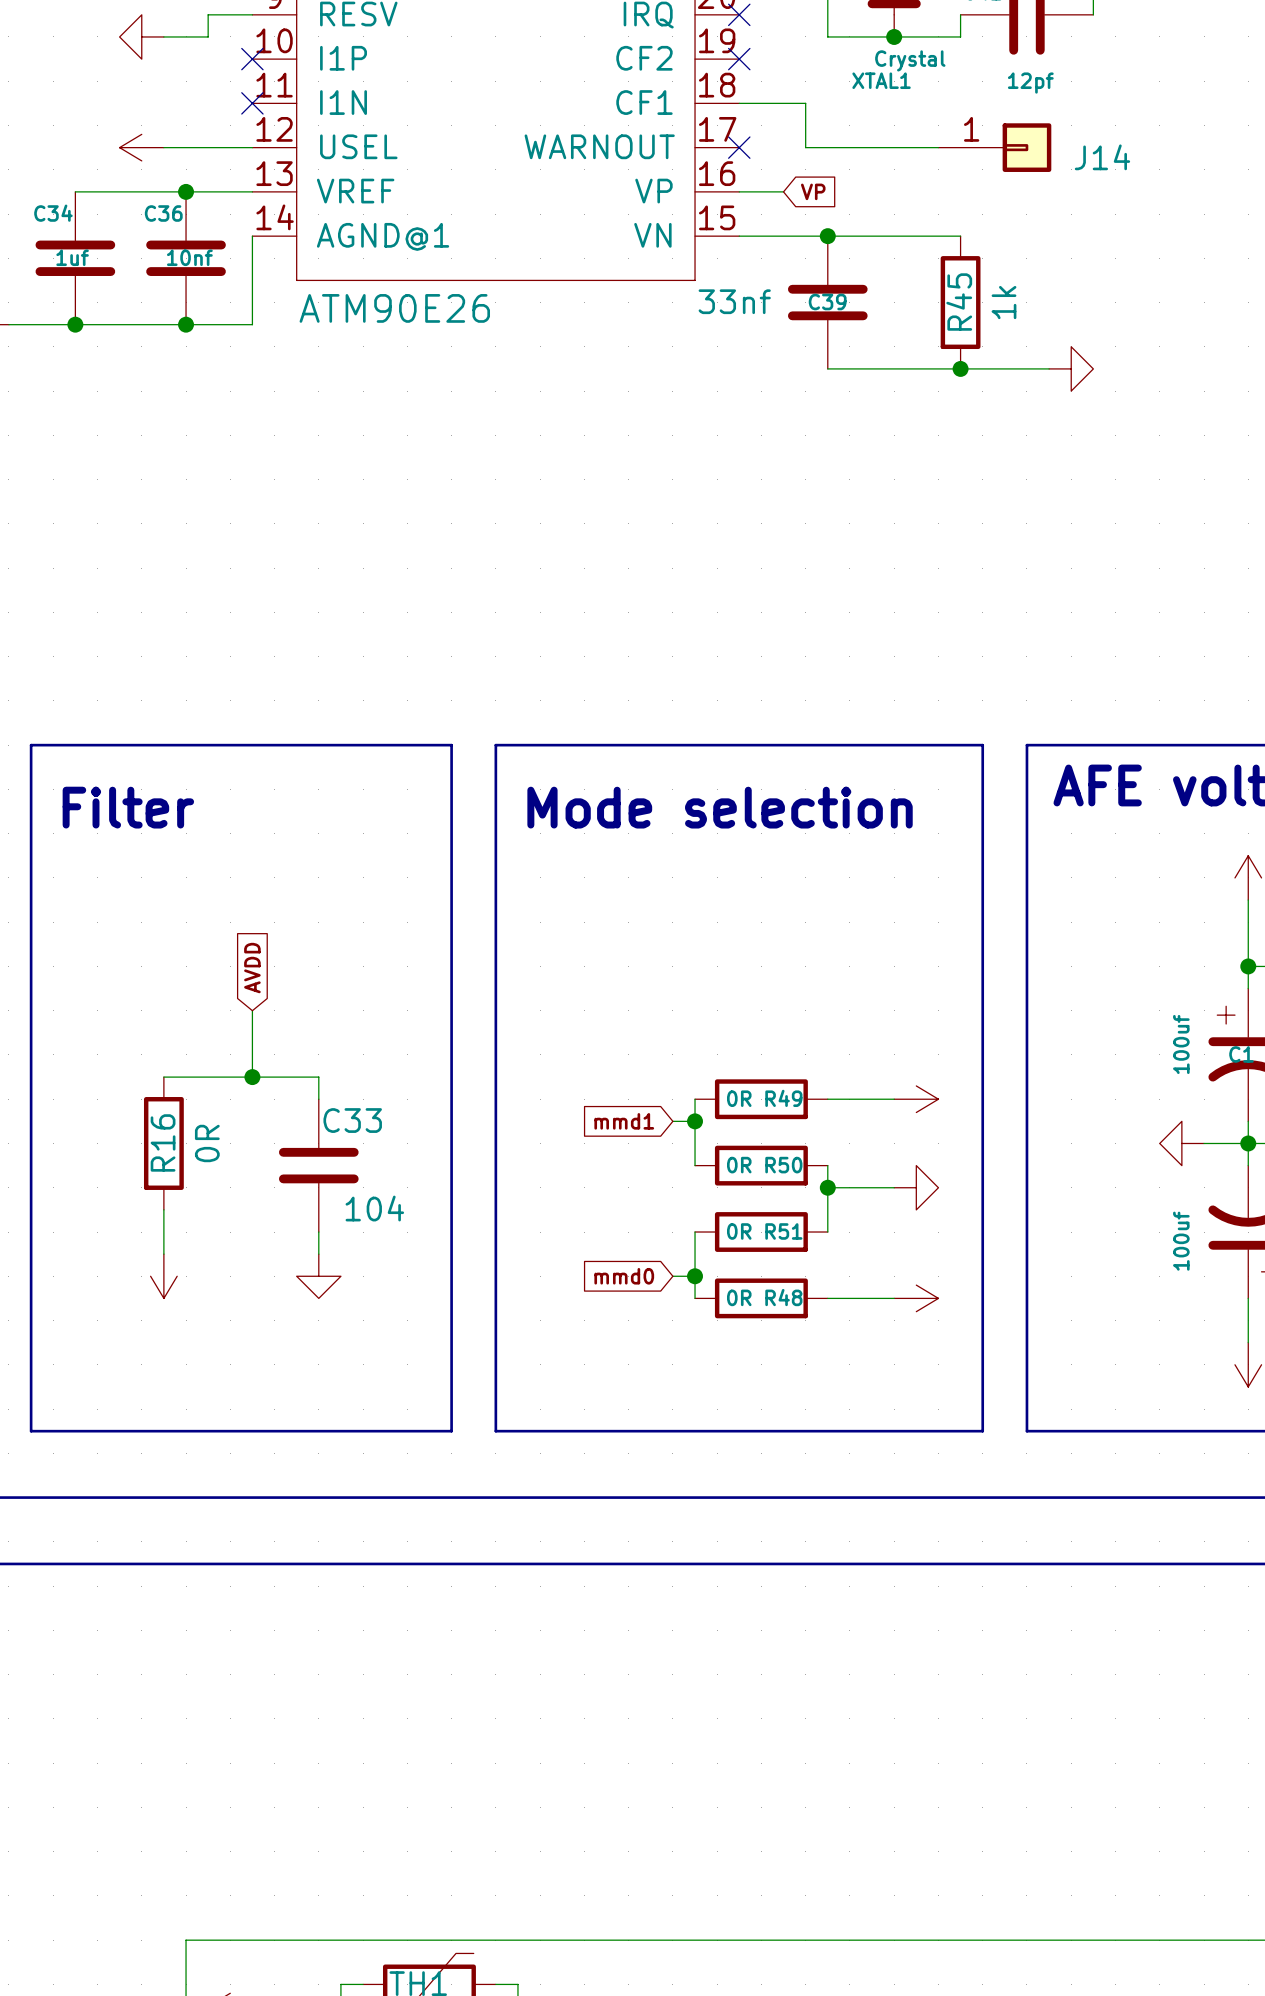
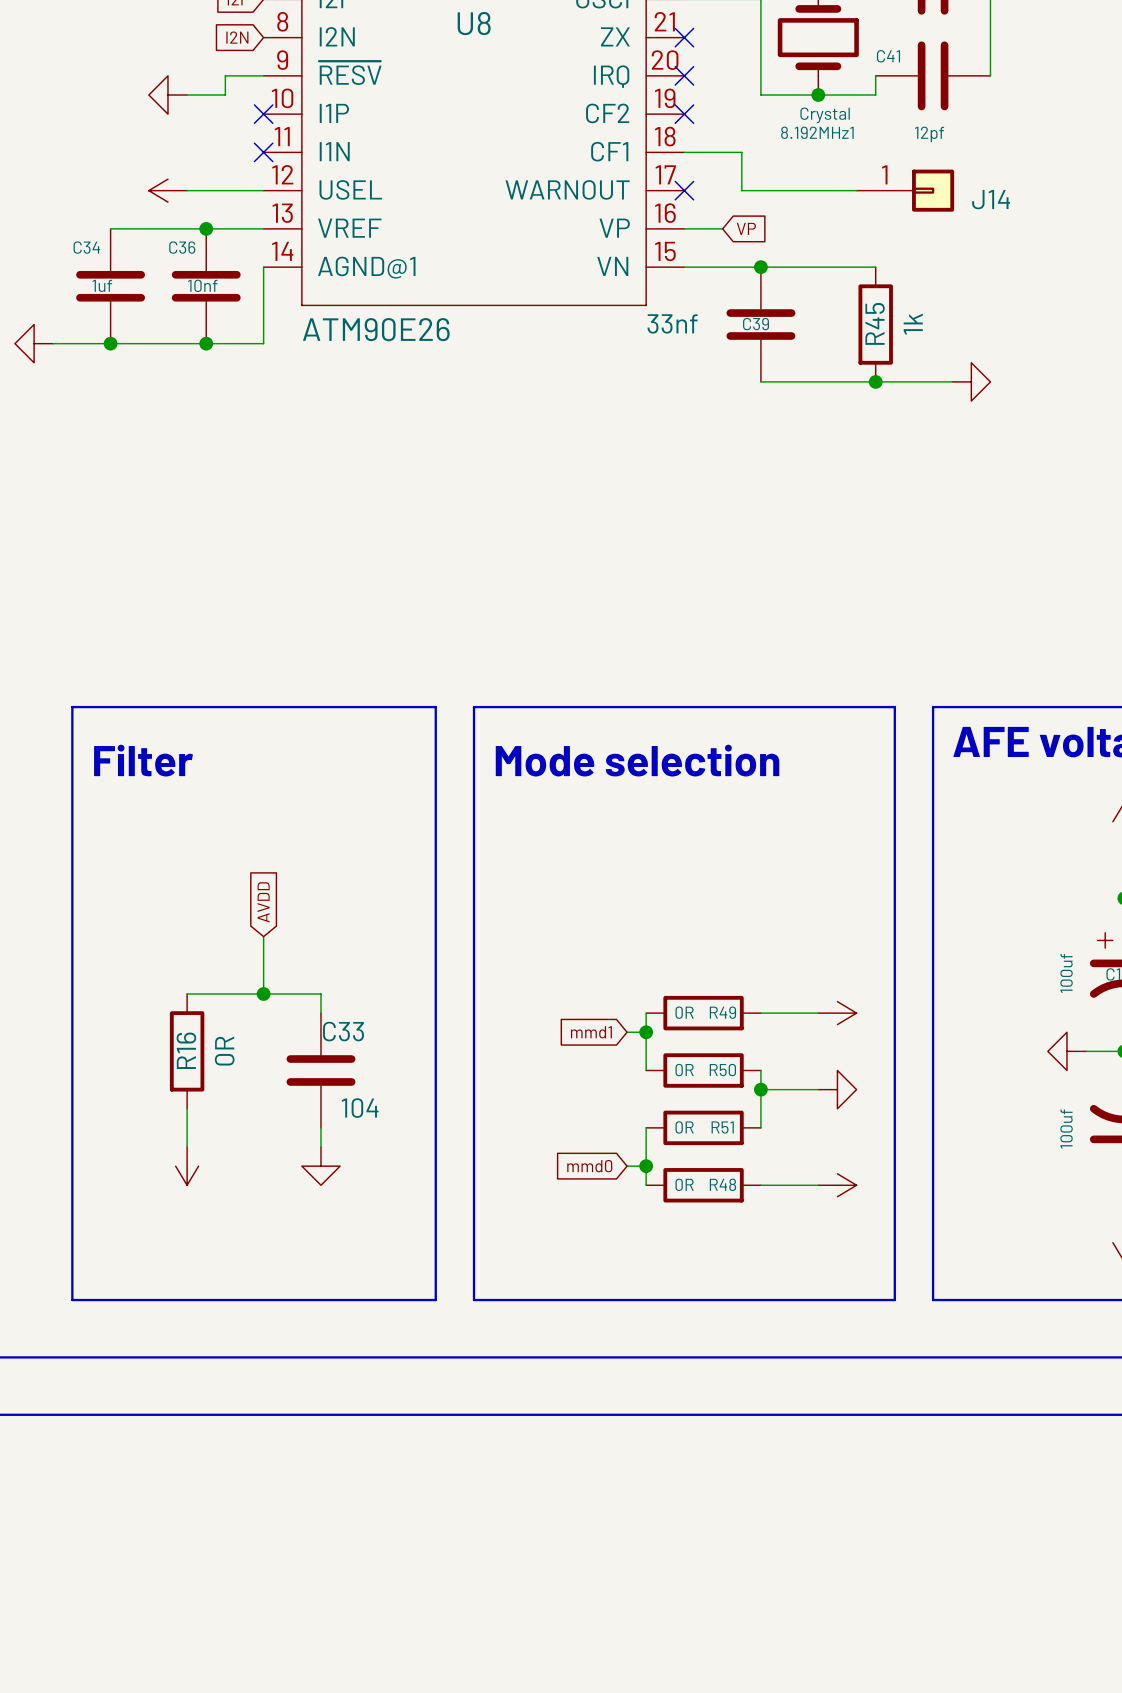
XTAL1 name: XTAL1 (881, 80) -> 8.192MHz1 (817, 132)

